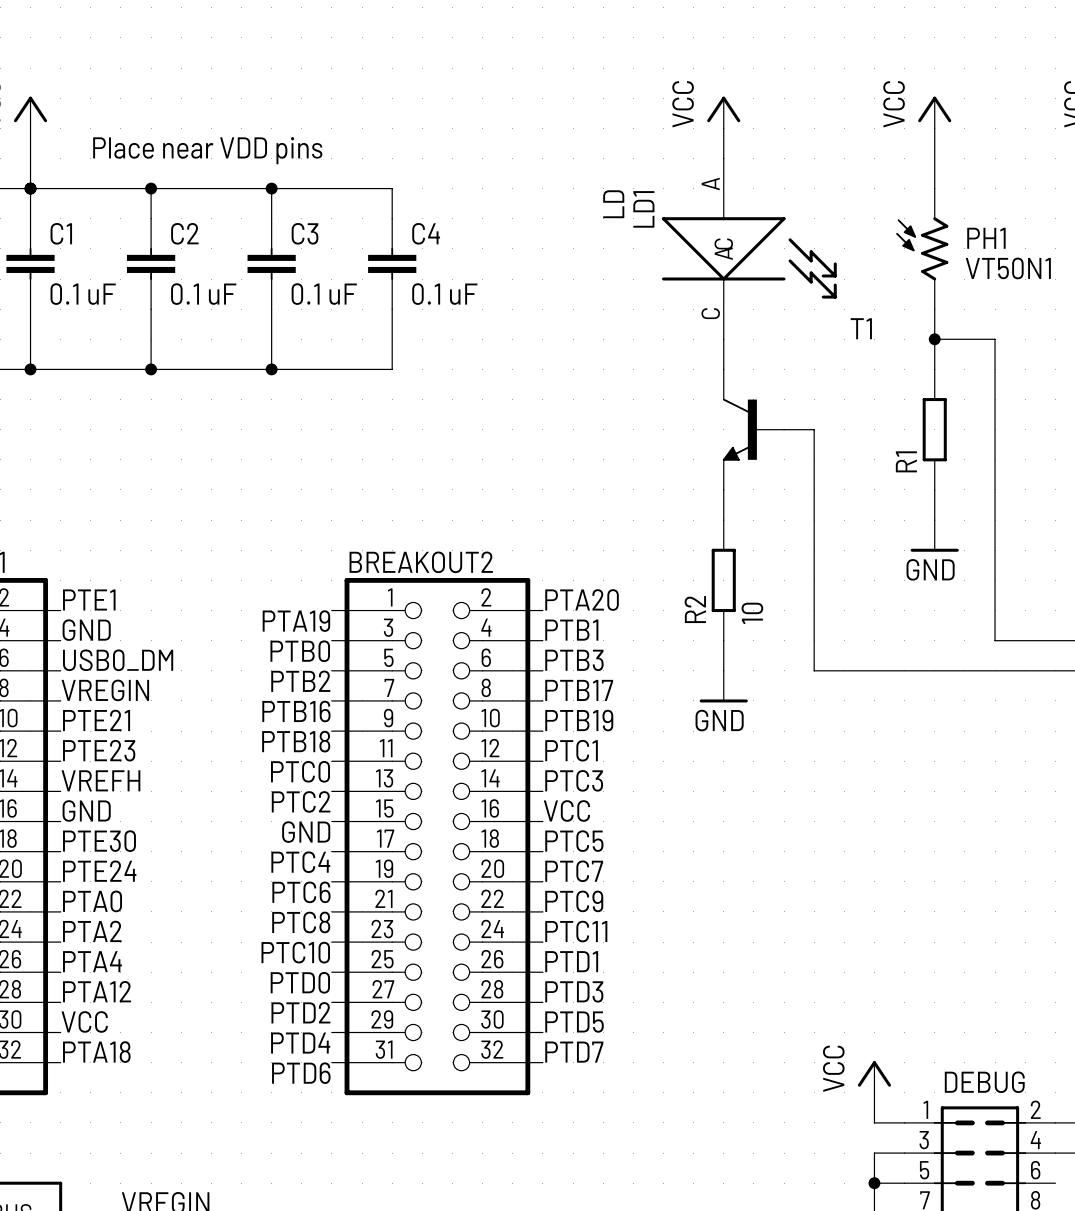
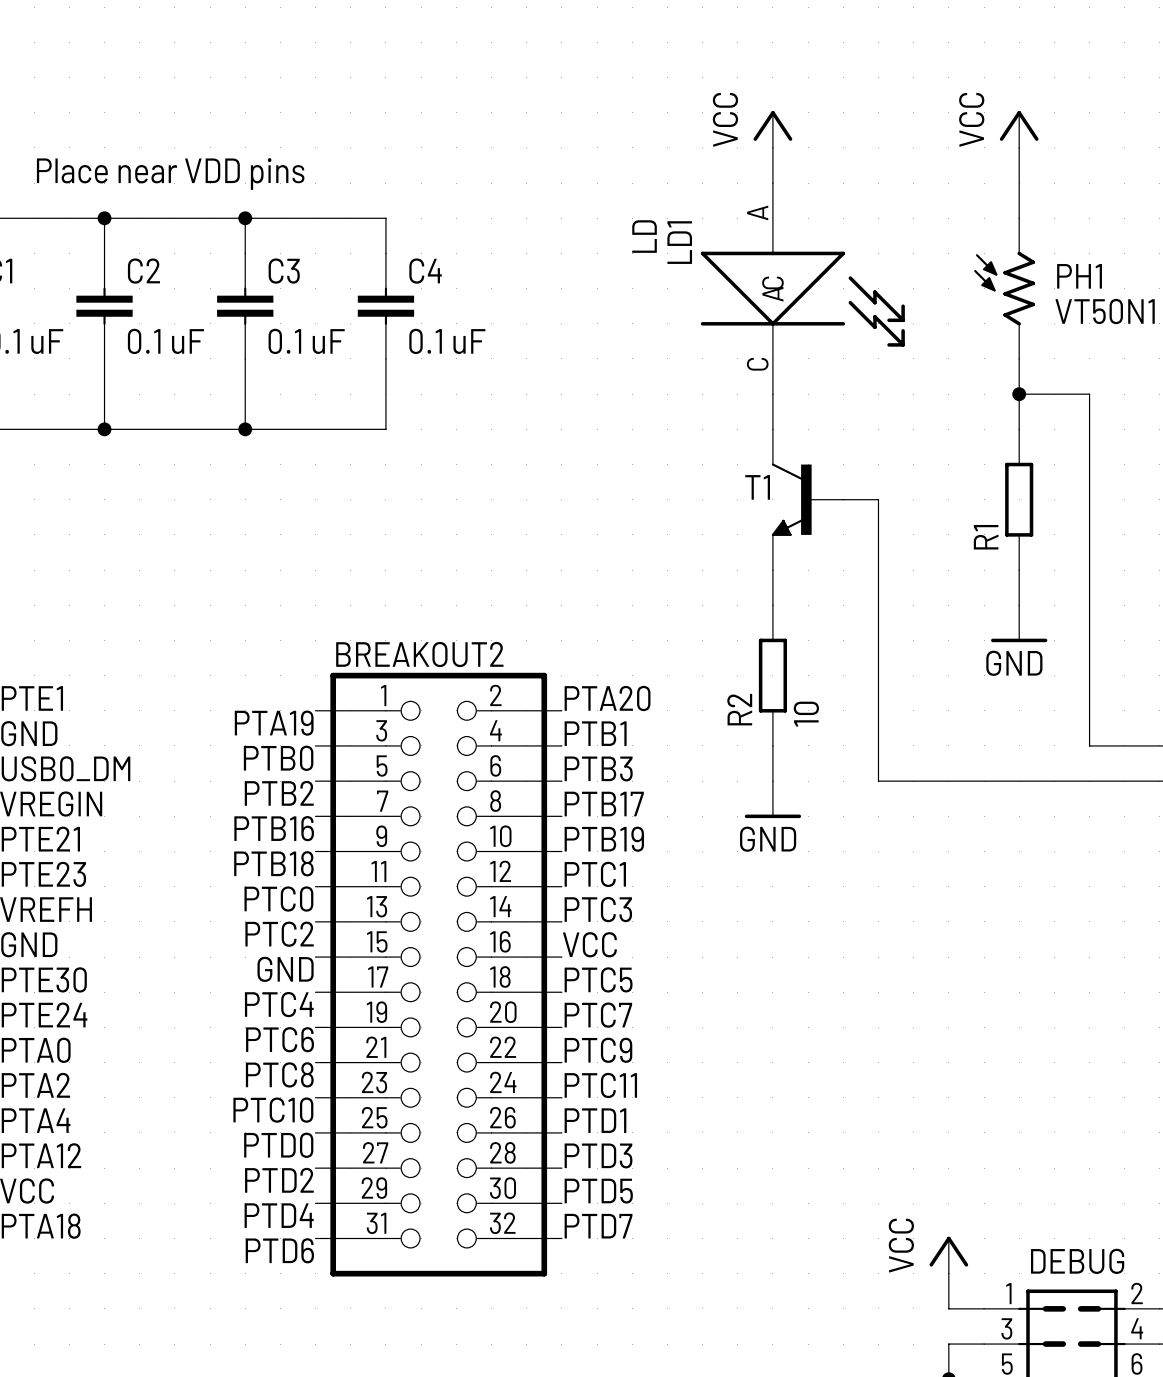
T1 name position: T1 (861, 328) -> T1 (757, 487)

